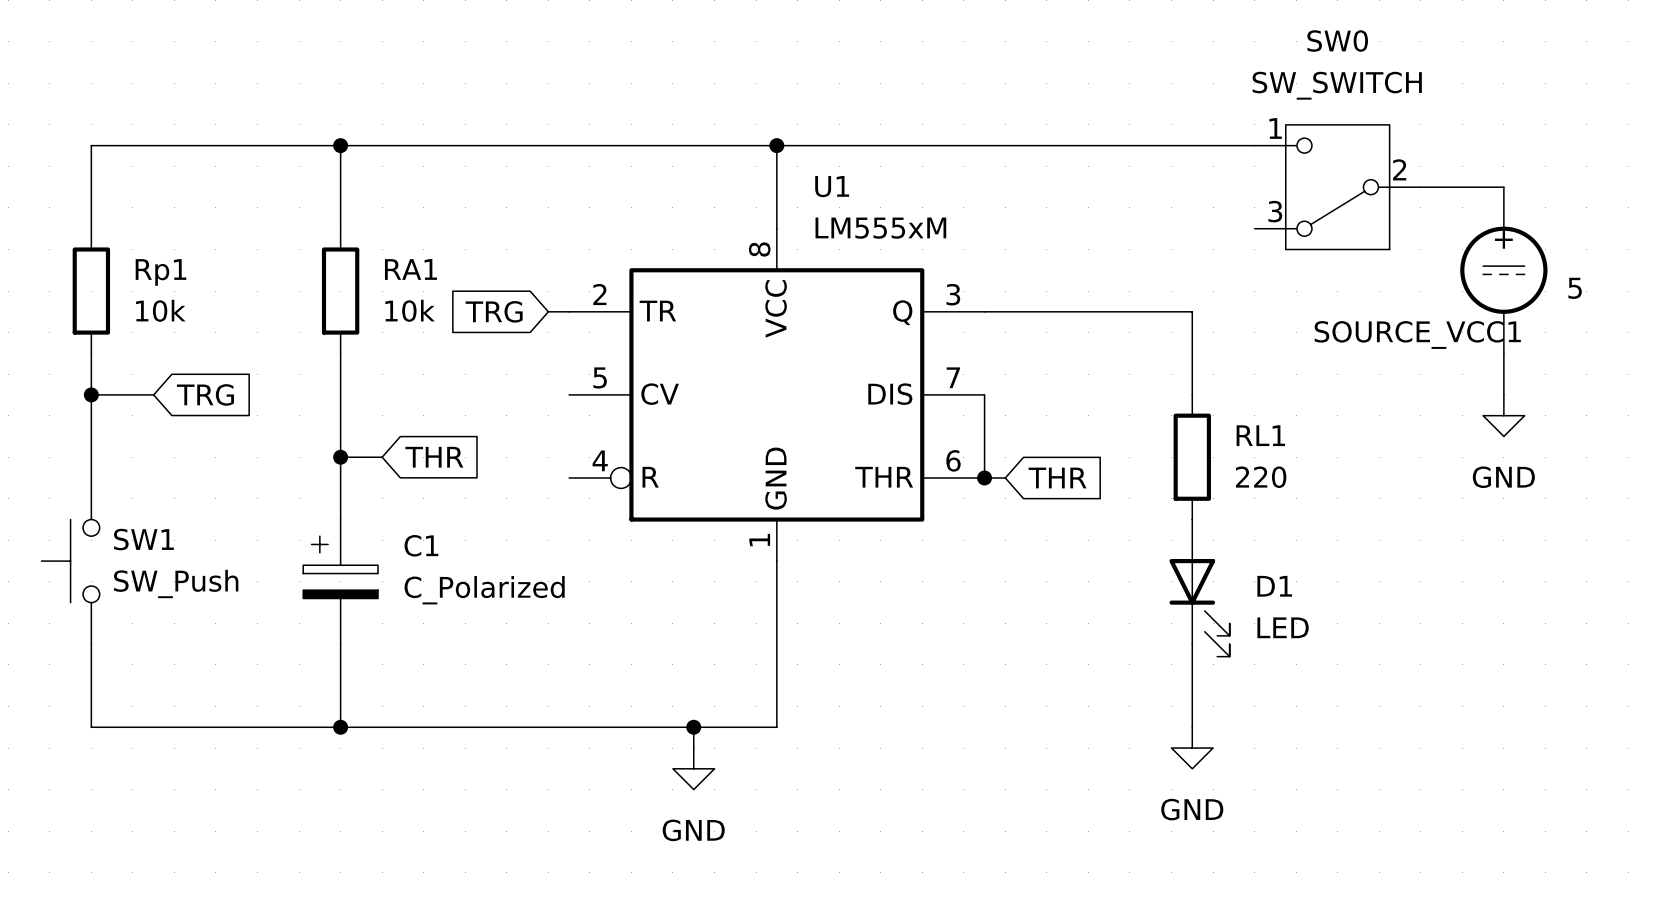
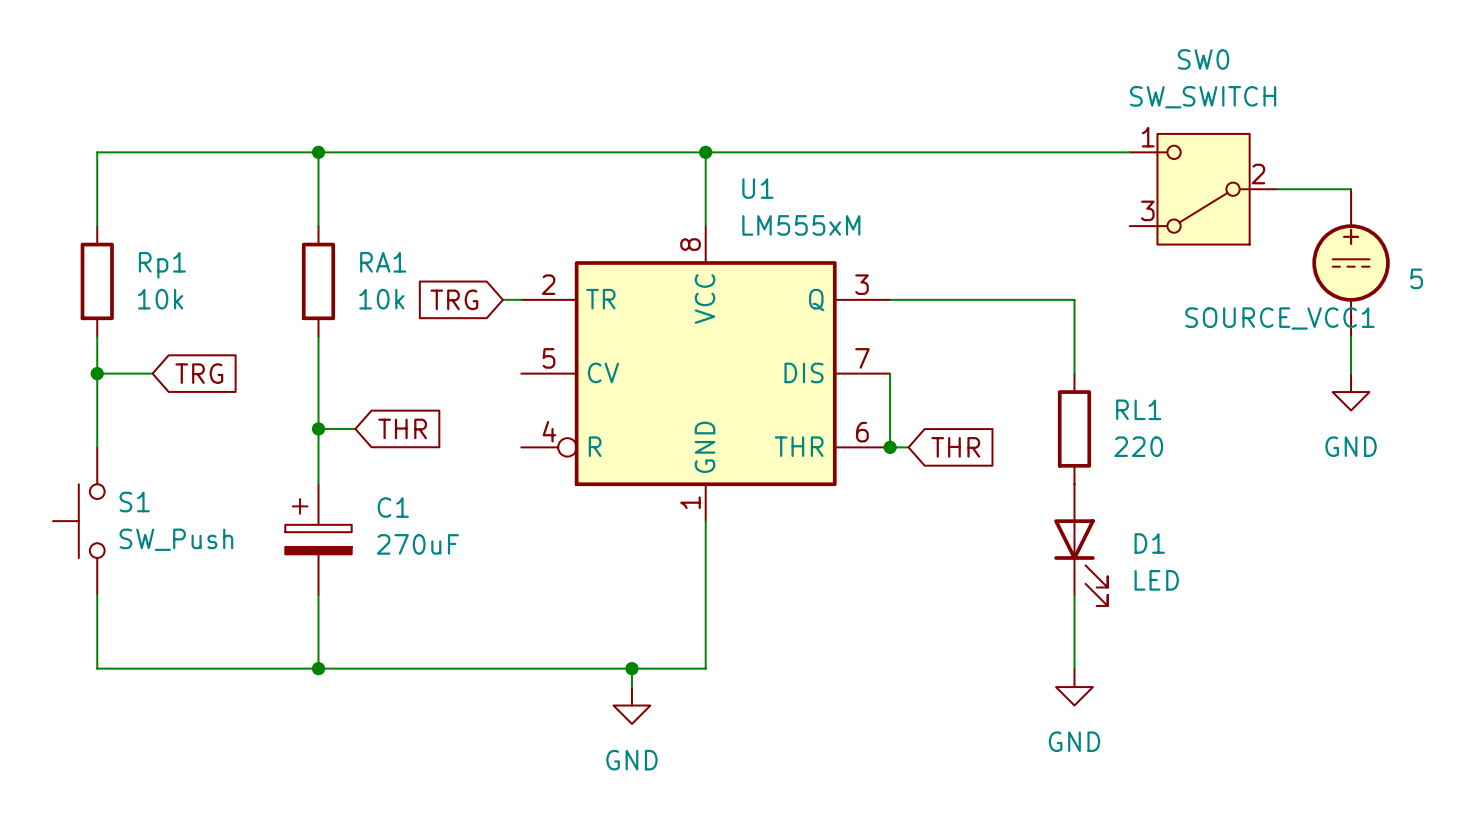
SW1 name: SW1 (143, 539) -> S1 (134, 502)
C1 value: C_Polarized (484, 590) -> 270uF (417, 544)

